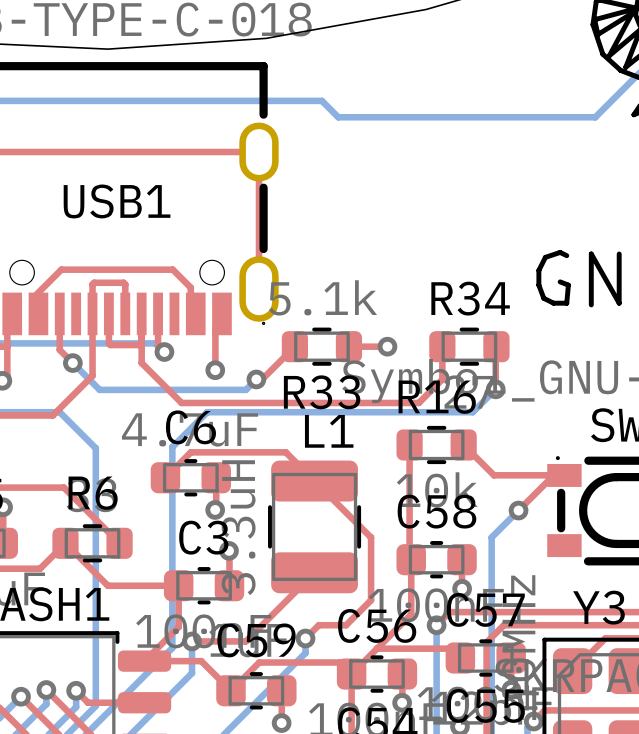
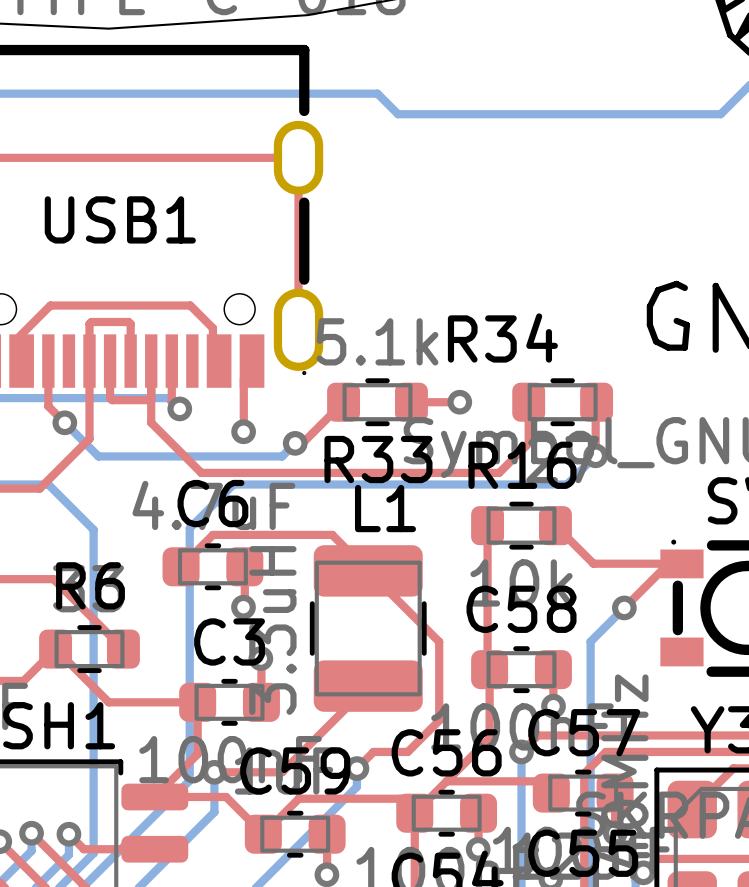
R34 name position: R34 (470, 298) -> R34 (502, 337)

